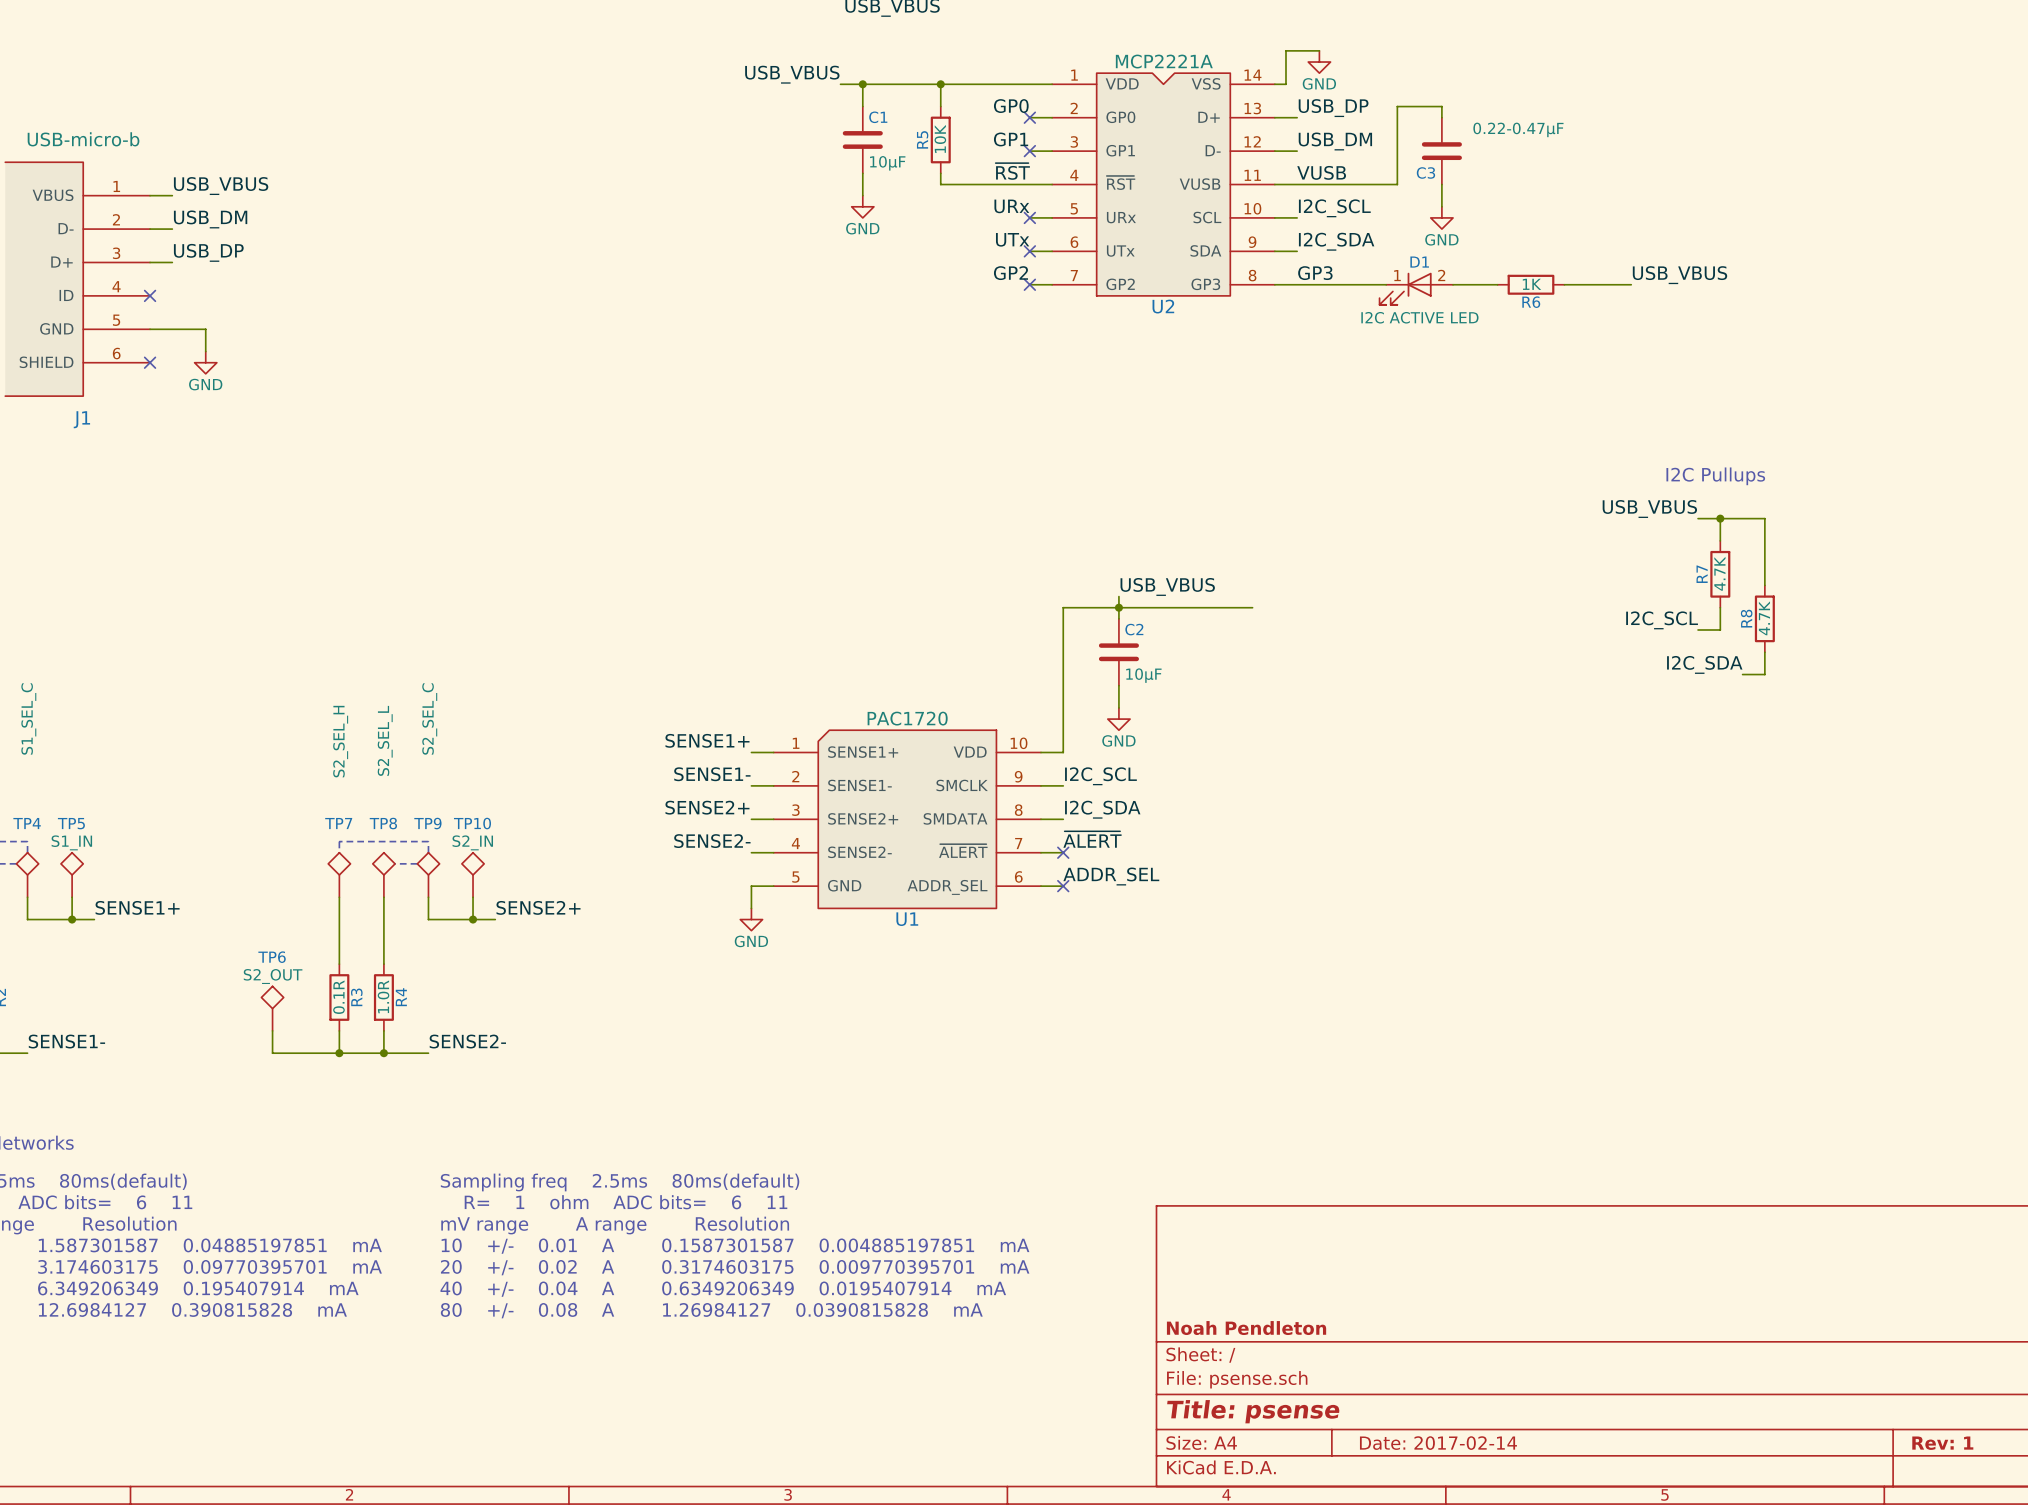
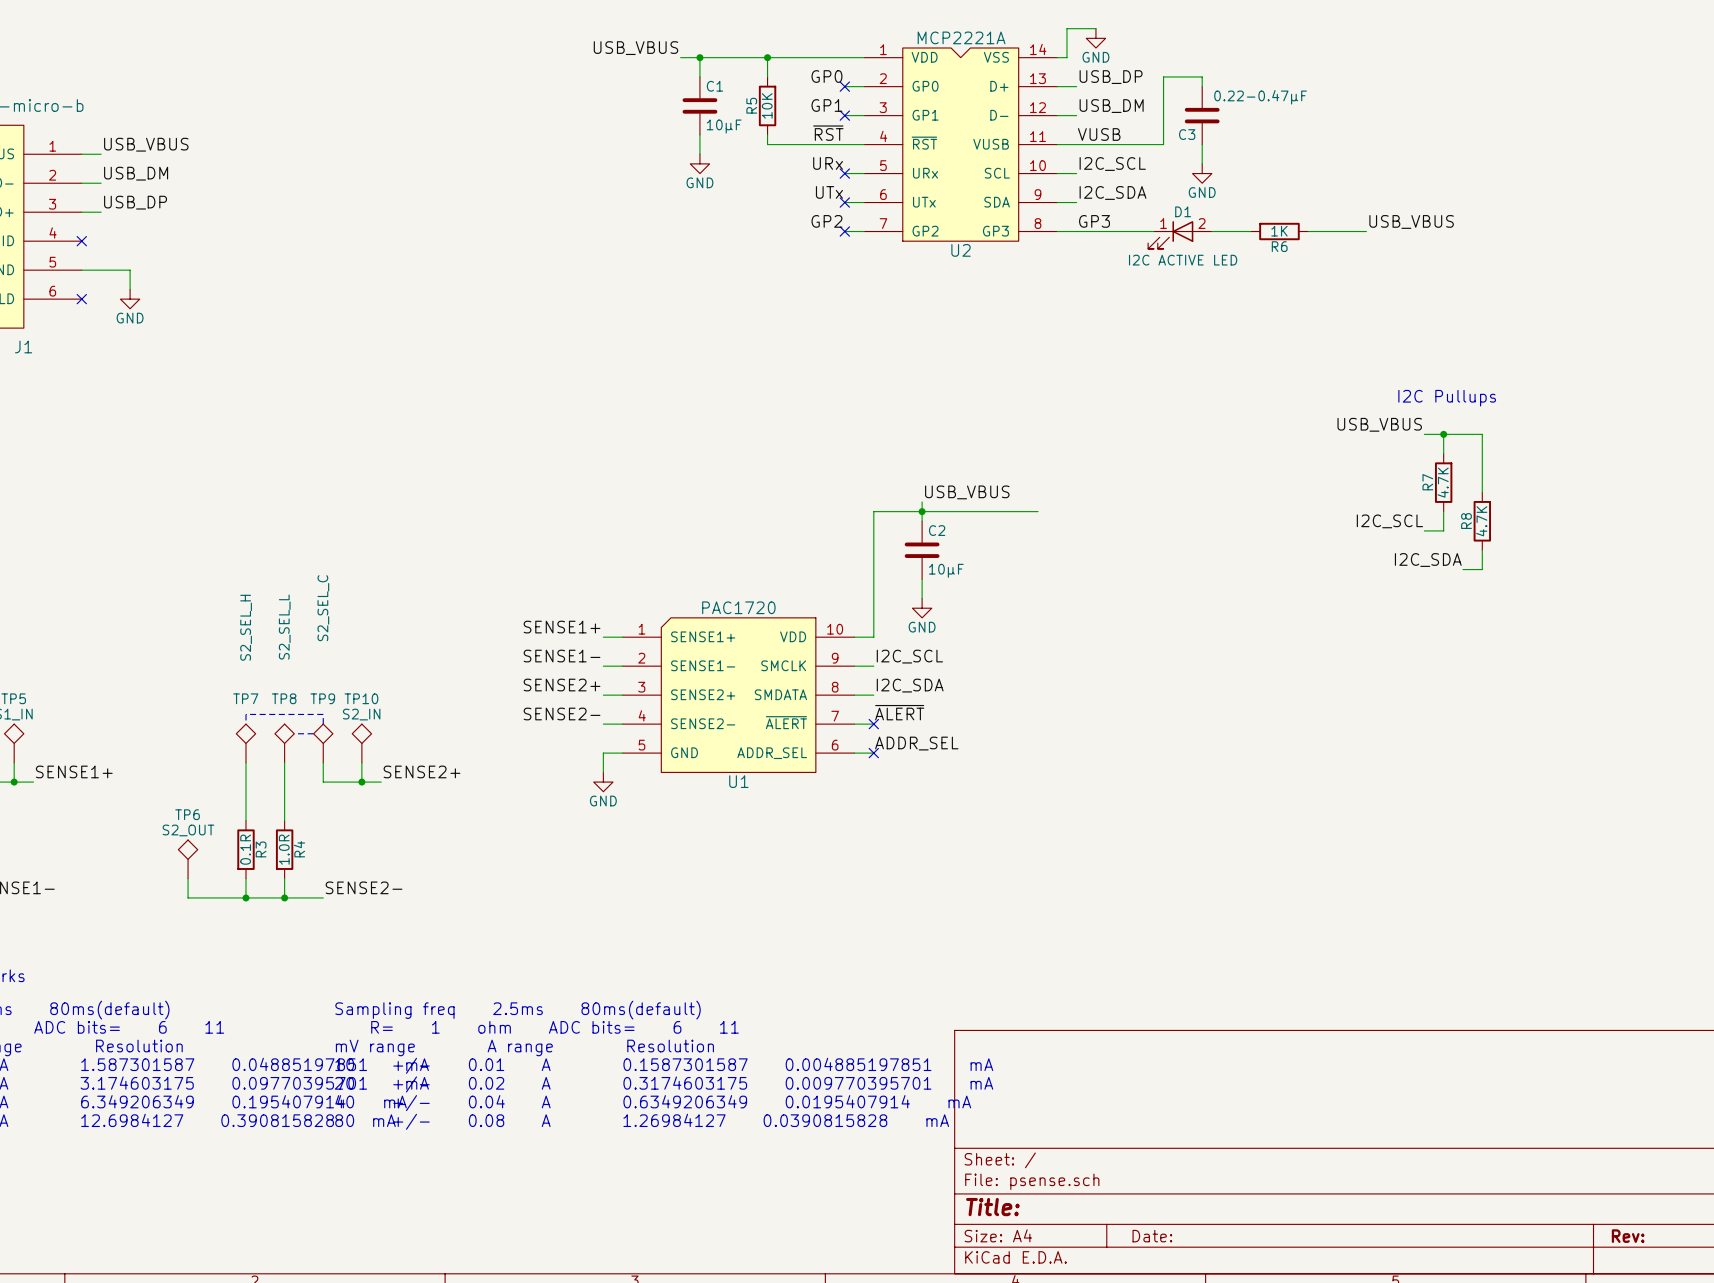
title block: Noah Pendleton (1246, 1328) -> none
title block: Title: psense (1253, 1411) -> Title: (992, 1207)
title block: Date: 2017-02-14 (1438, 1443) -> Date: (1152, 1236)
title block: Rev: 1 (1942, 1443) -> Rev: (1628, 1236)

